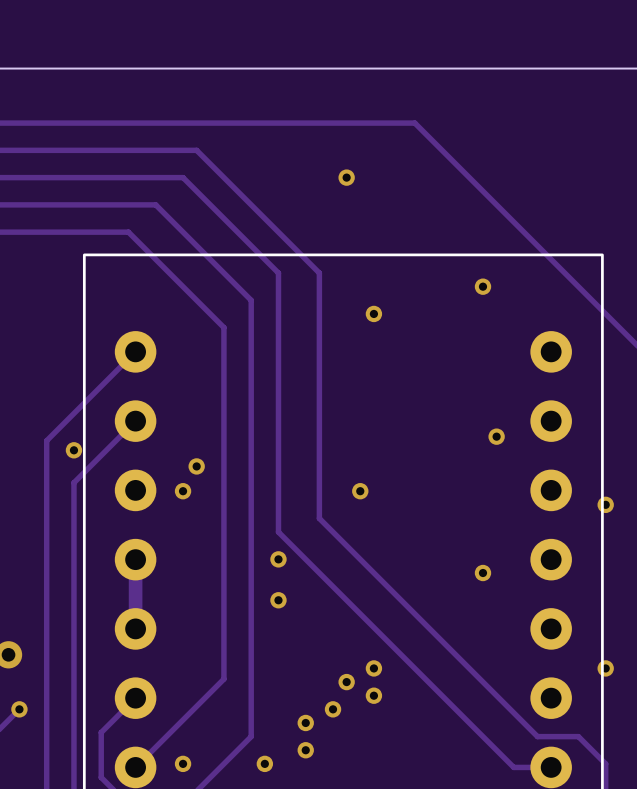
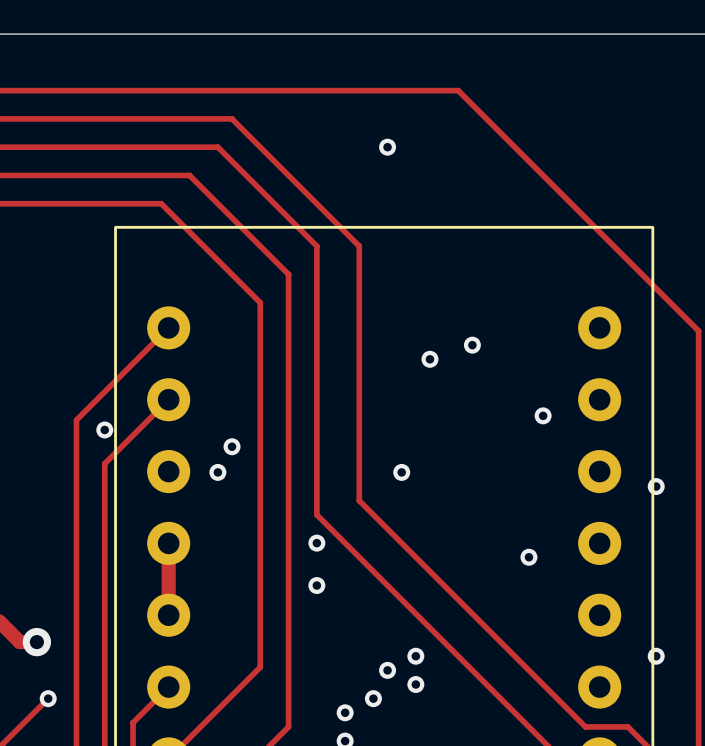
via: (482, 286) -> none
via: (373, 313) -> none
via: none -> (472, 345)
via: none -> (429, 359)

